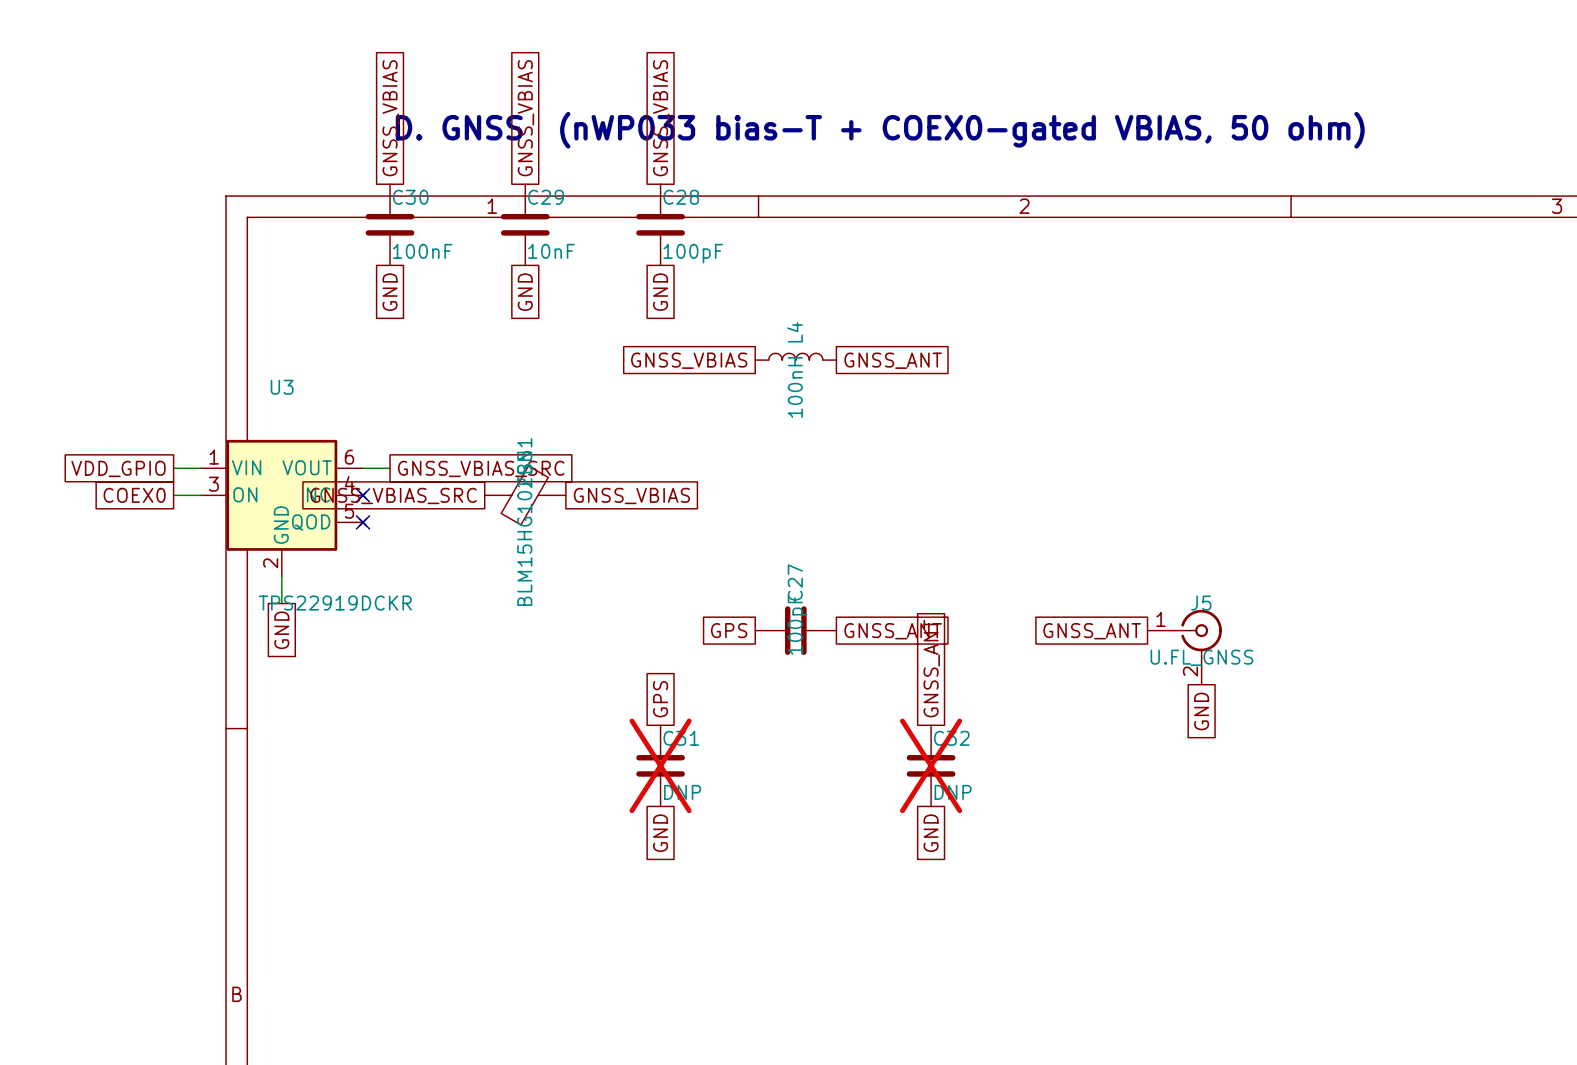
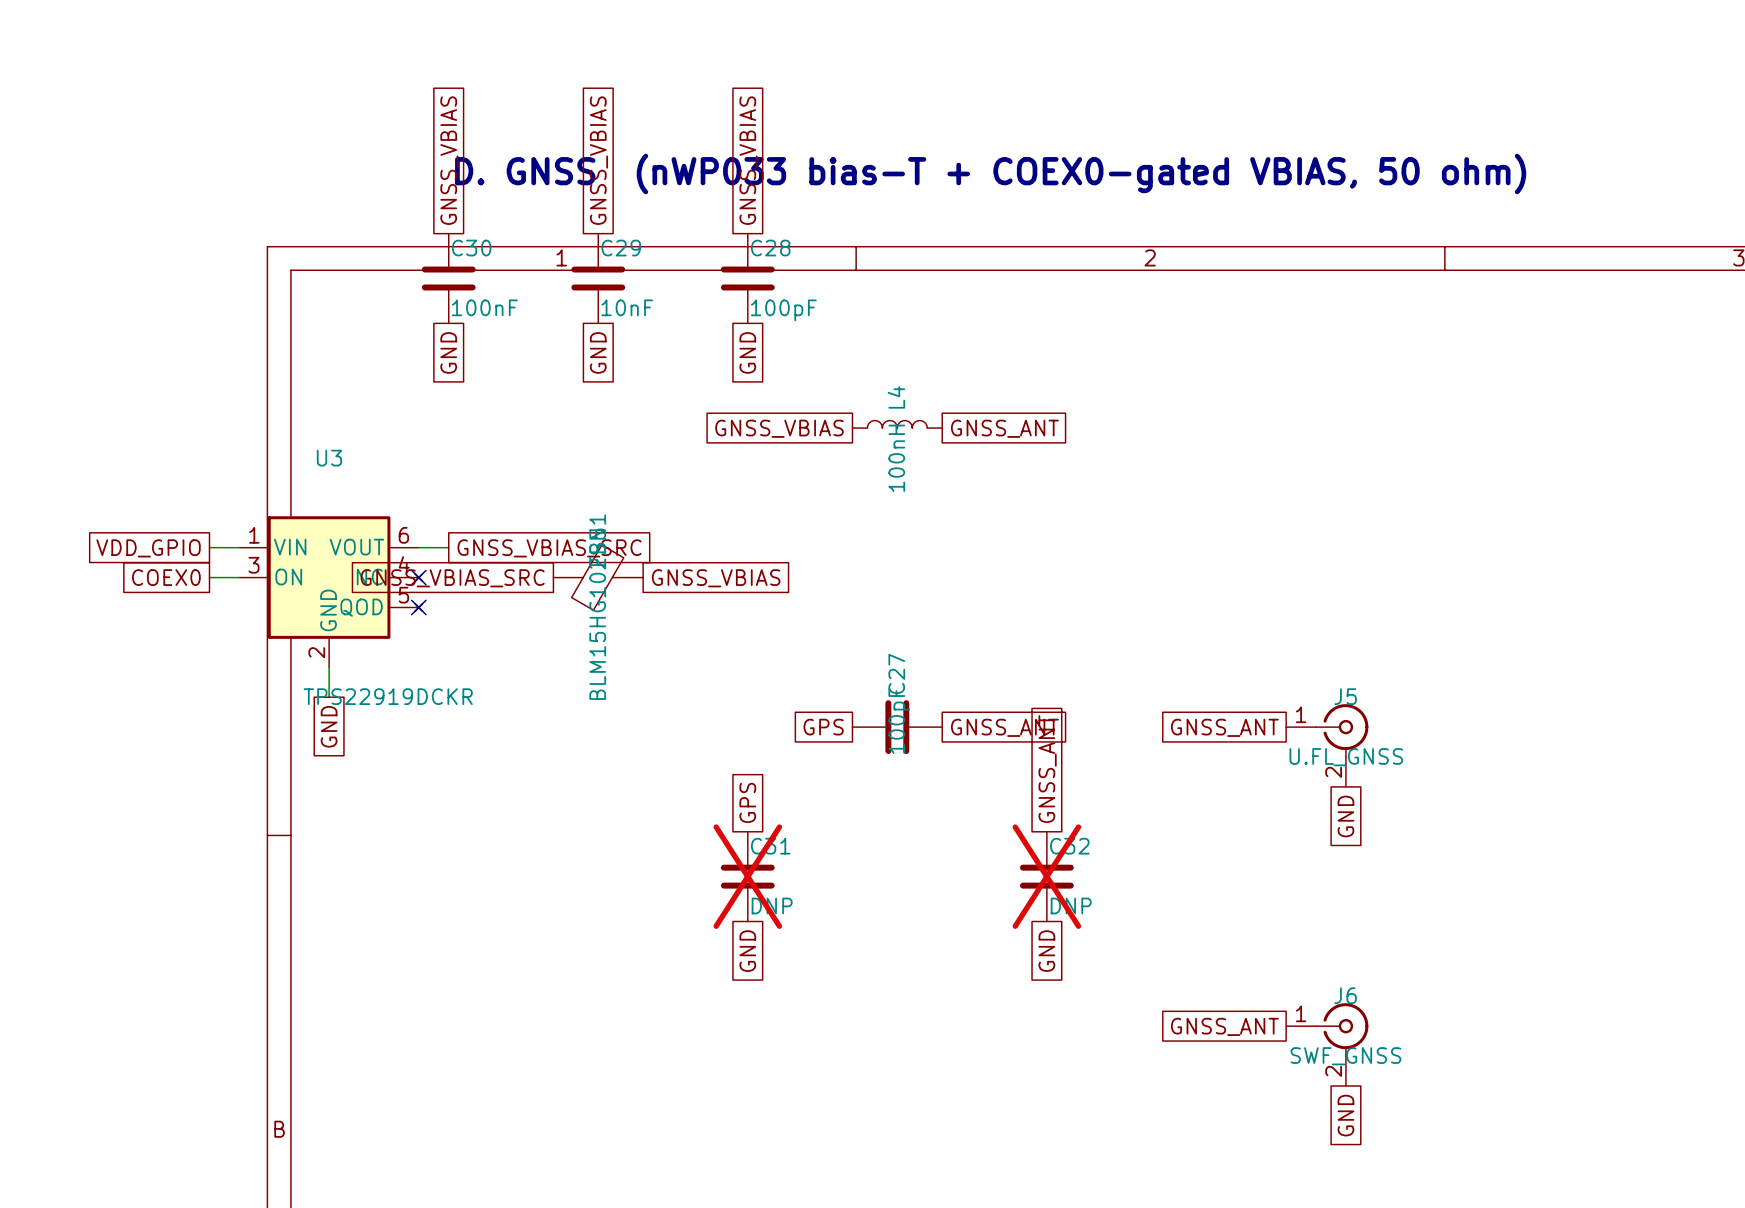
global label: none -> GNSS_ANT (1224, 1026)
J6: none -> SWF_GNSS (1327, 1044)
global label: none -> GND (1345, 1115)

